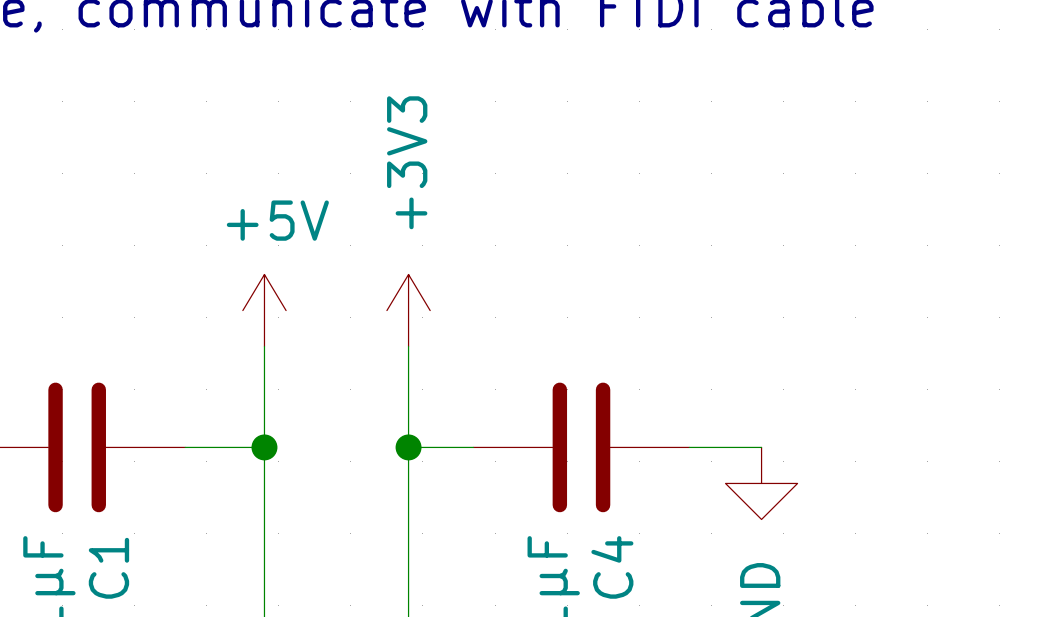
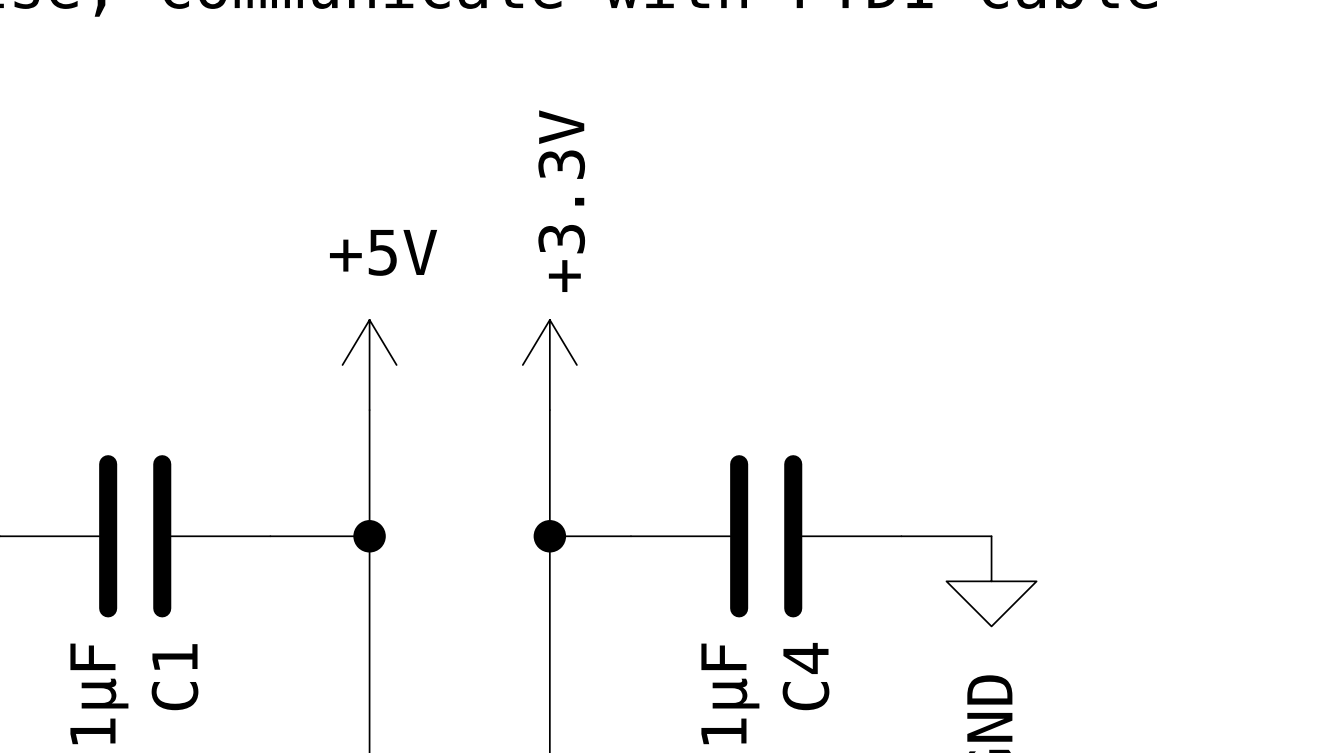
power symbol: +3V3 (408, 310) -> +3.3V (549, 365)

